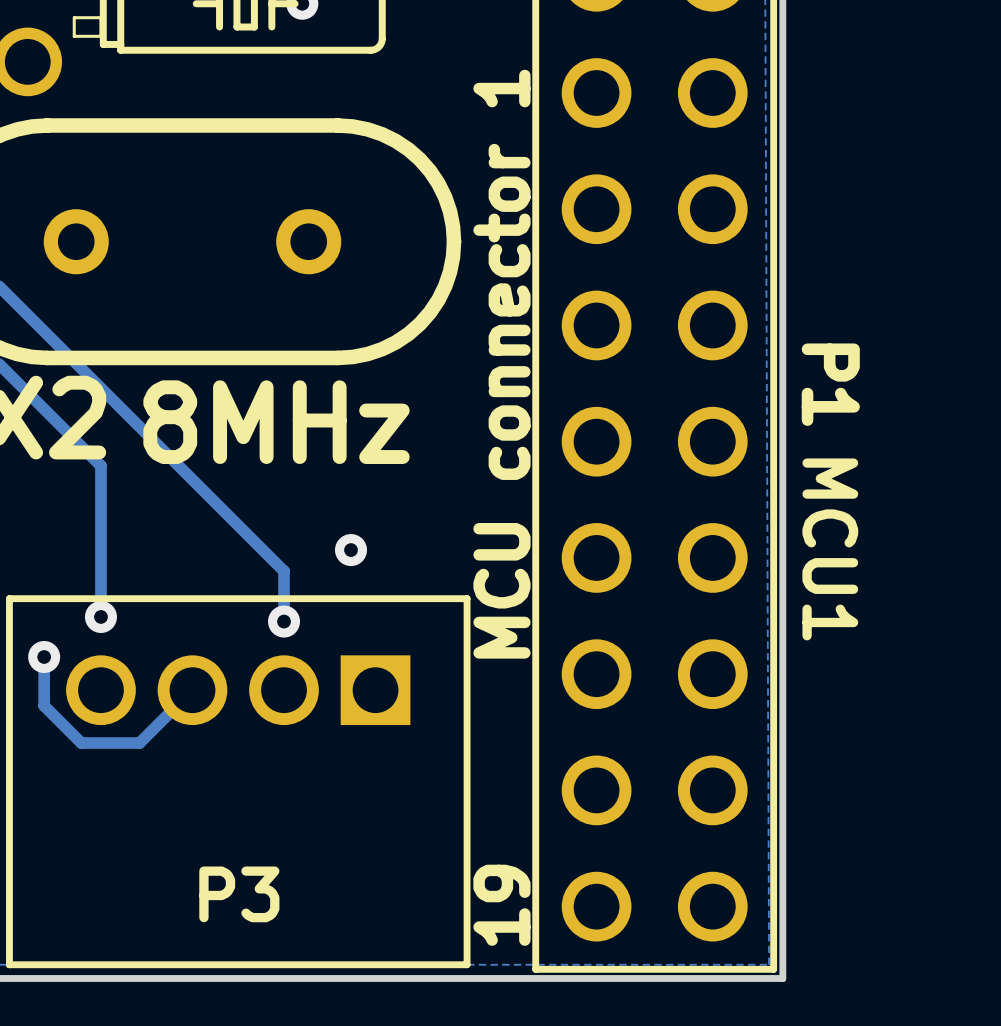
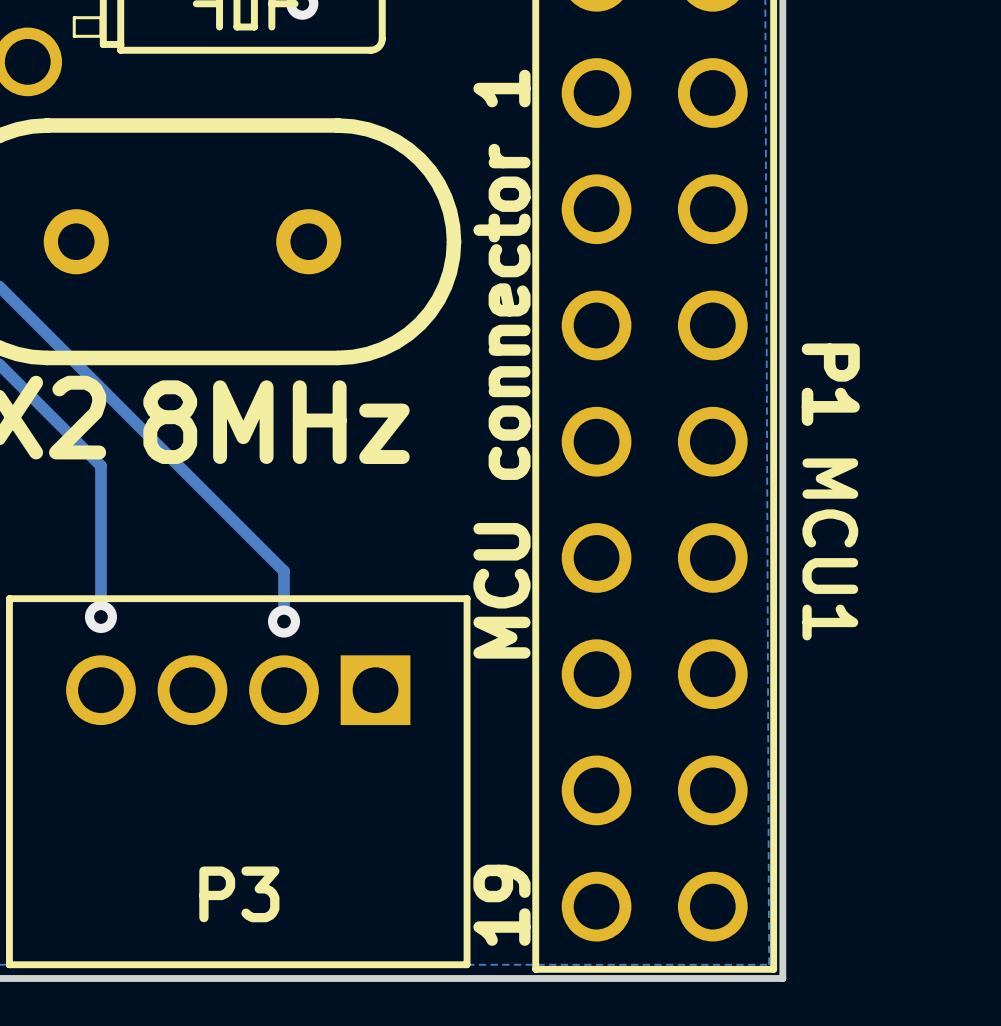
via: (351, 550) -> none
track: (44, 657) (44, 705) (81, 743) (139, 743) (192, 690) -> none
via: (44, 657) -> none

